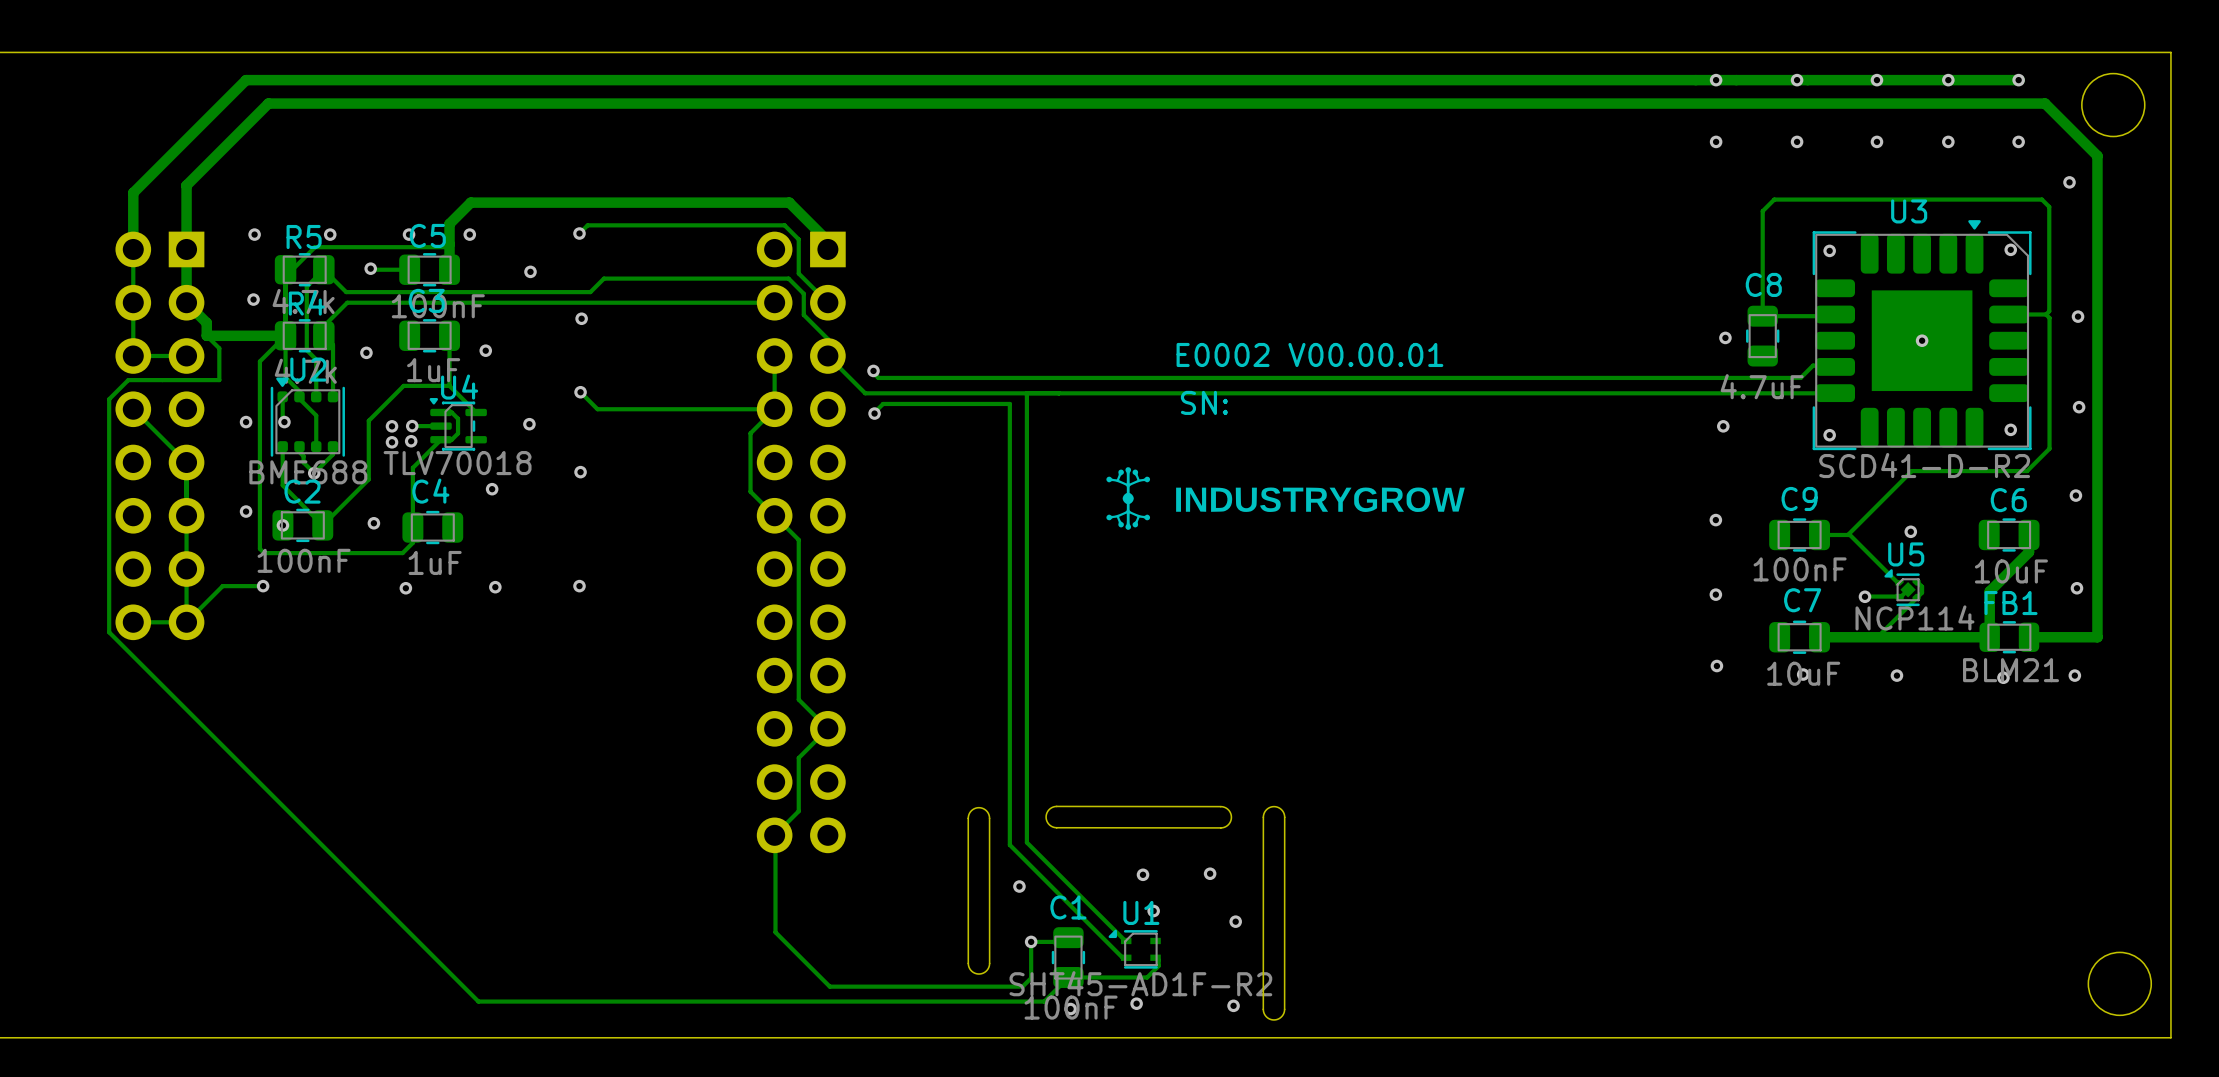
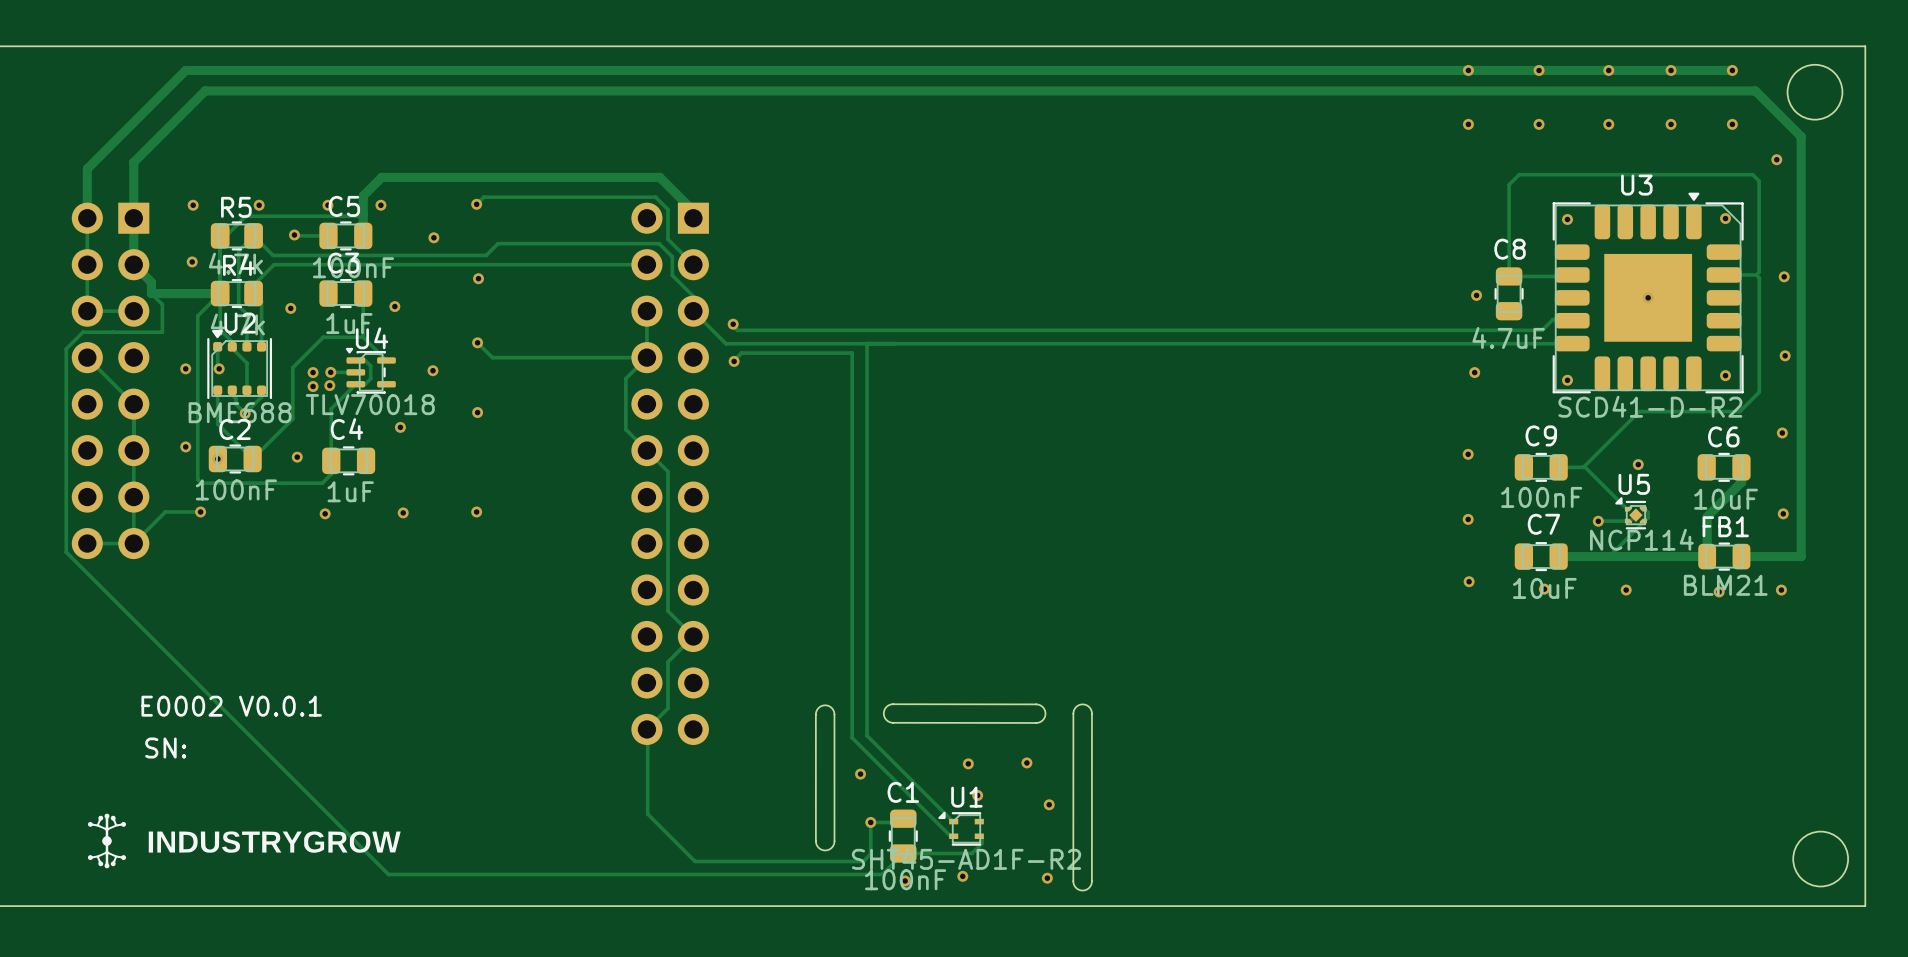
text: E0002 V00.00.01 (1309, 354) -> none
text: SN: (1204, 402) -> none
drawing: [1106, 467, 1465, 530] -> none
text: none -> E0002 V0.0.1 (231, 706)
text: none -> SN: (165, 748)
drawing: none -> [87, 813, 401, 869]

